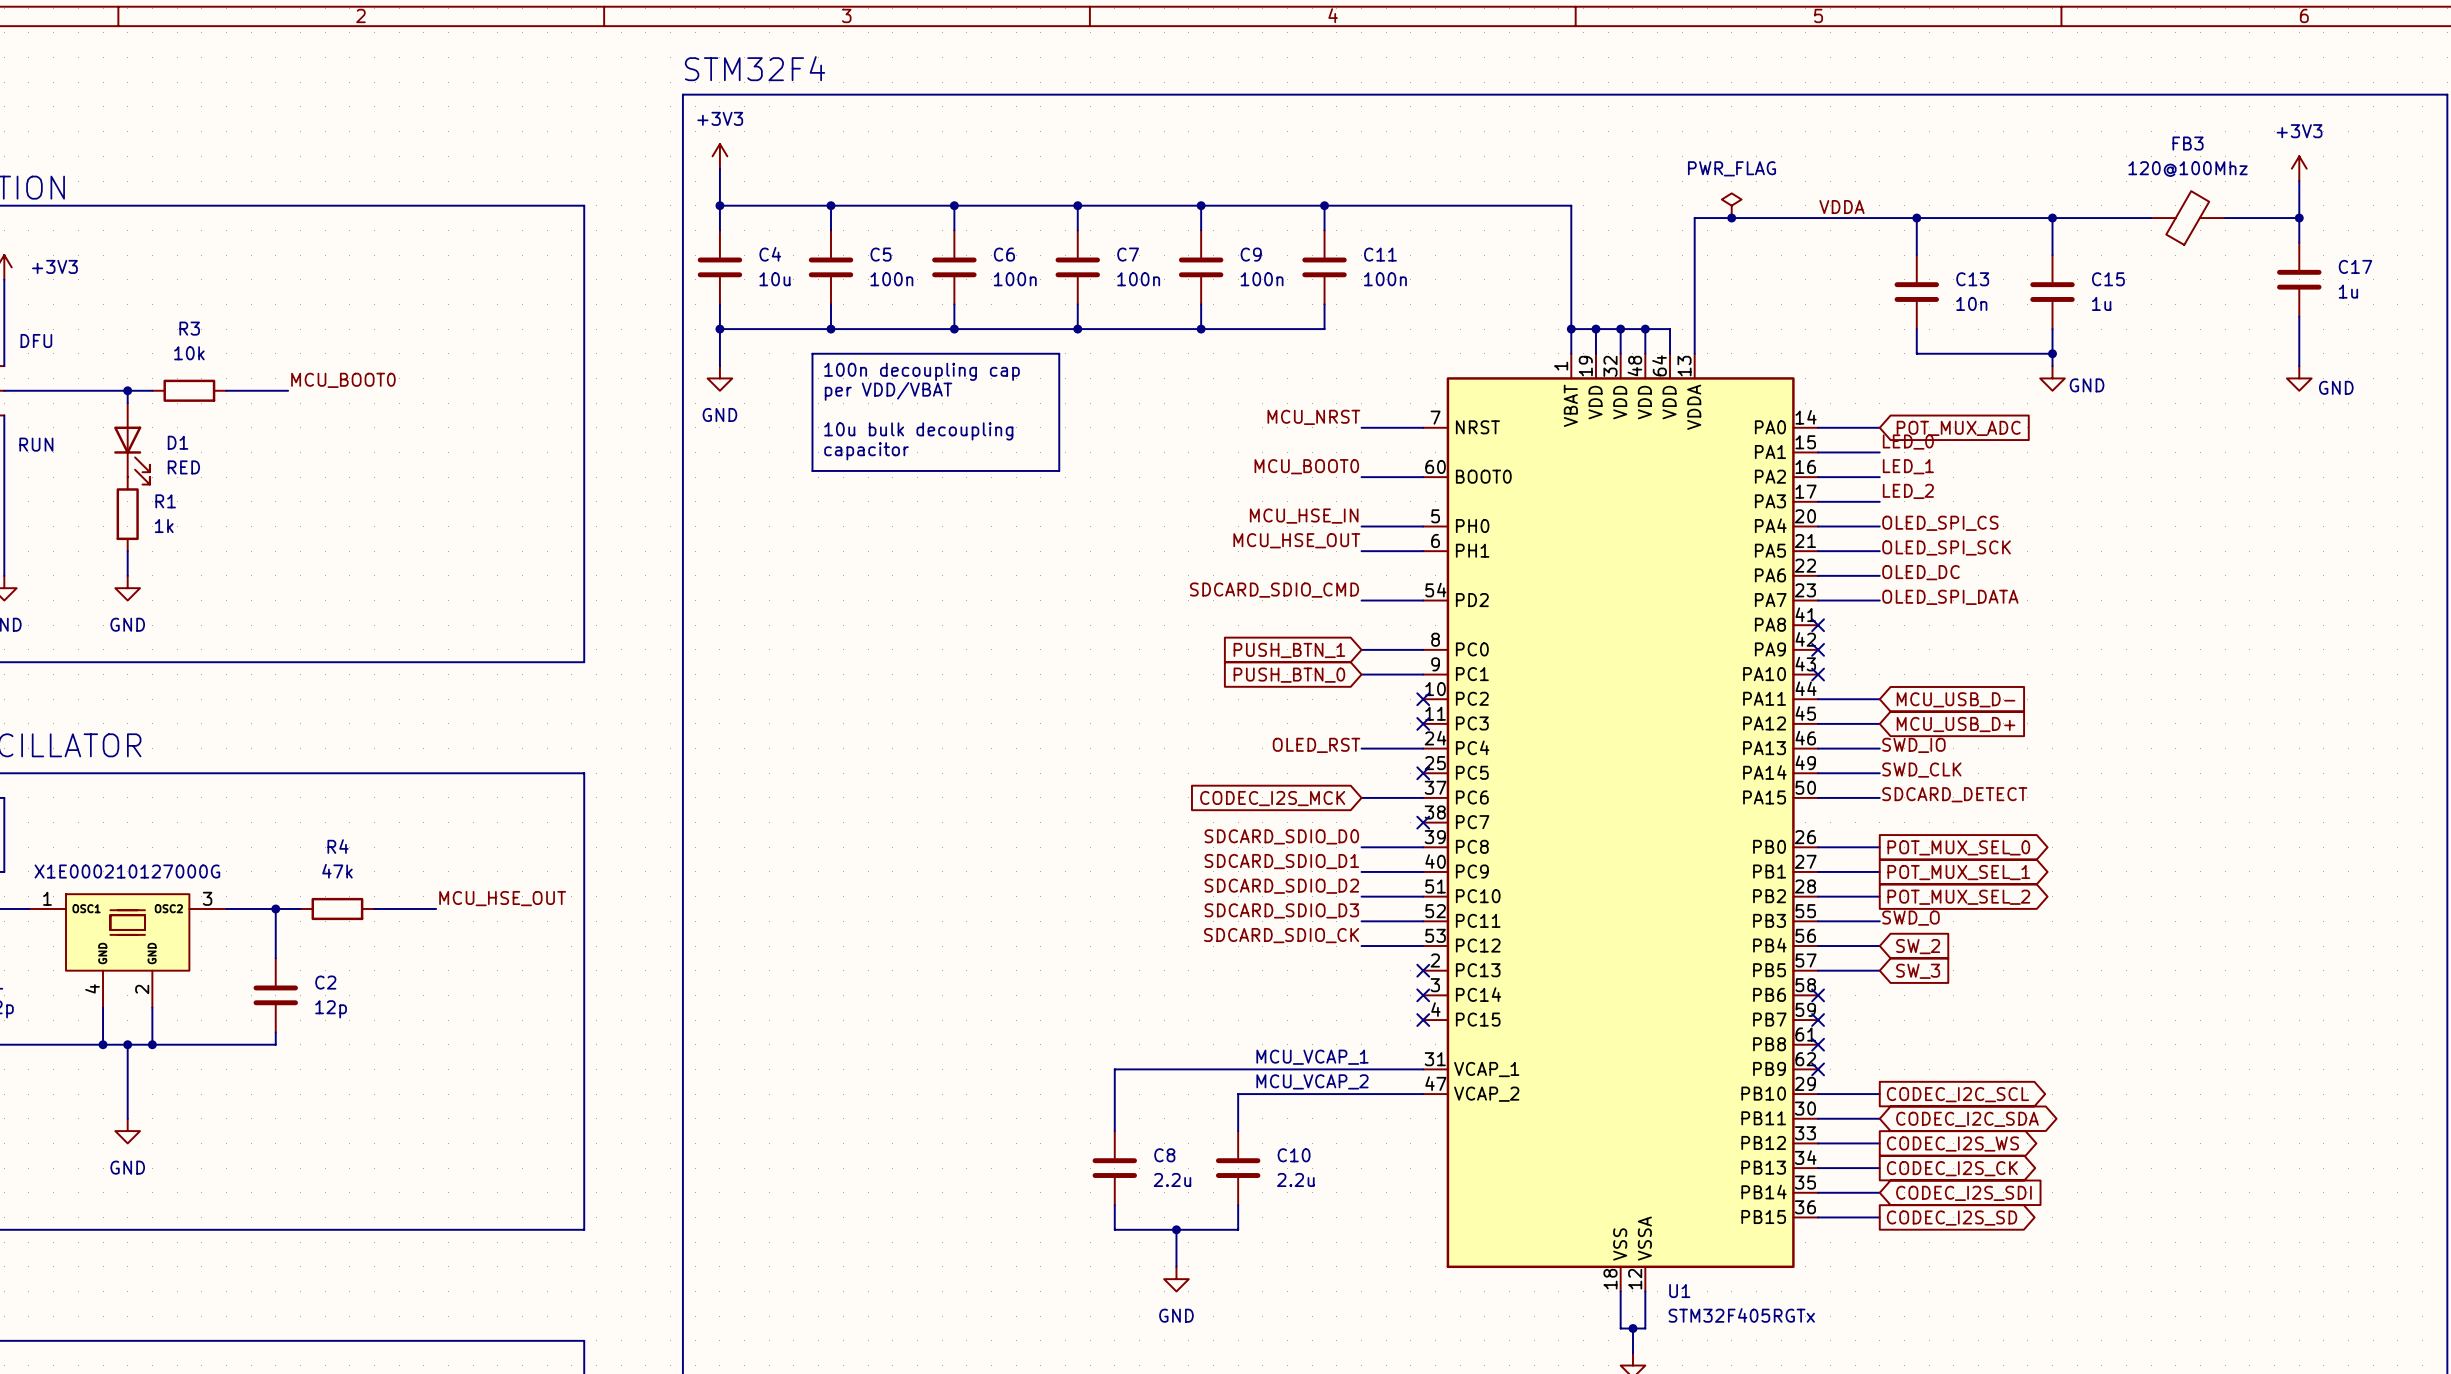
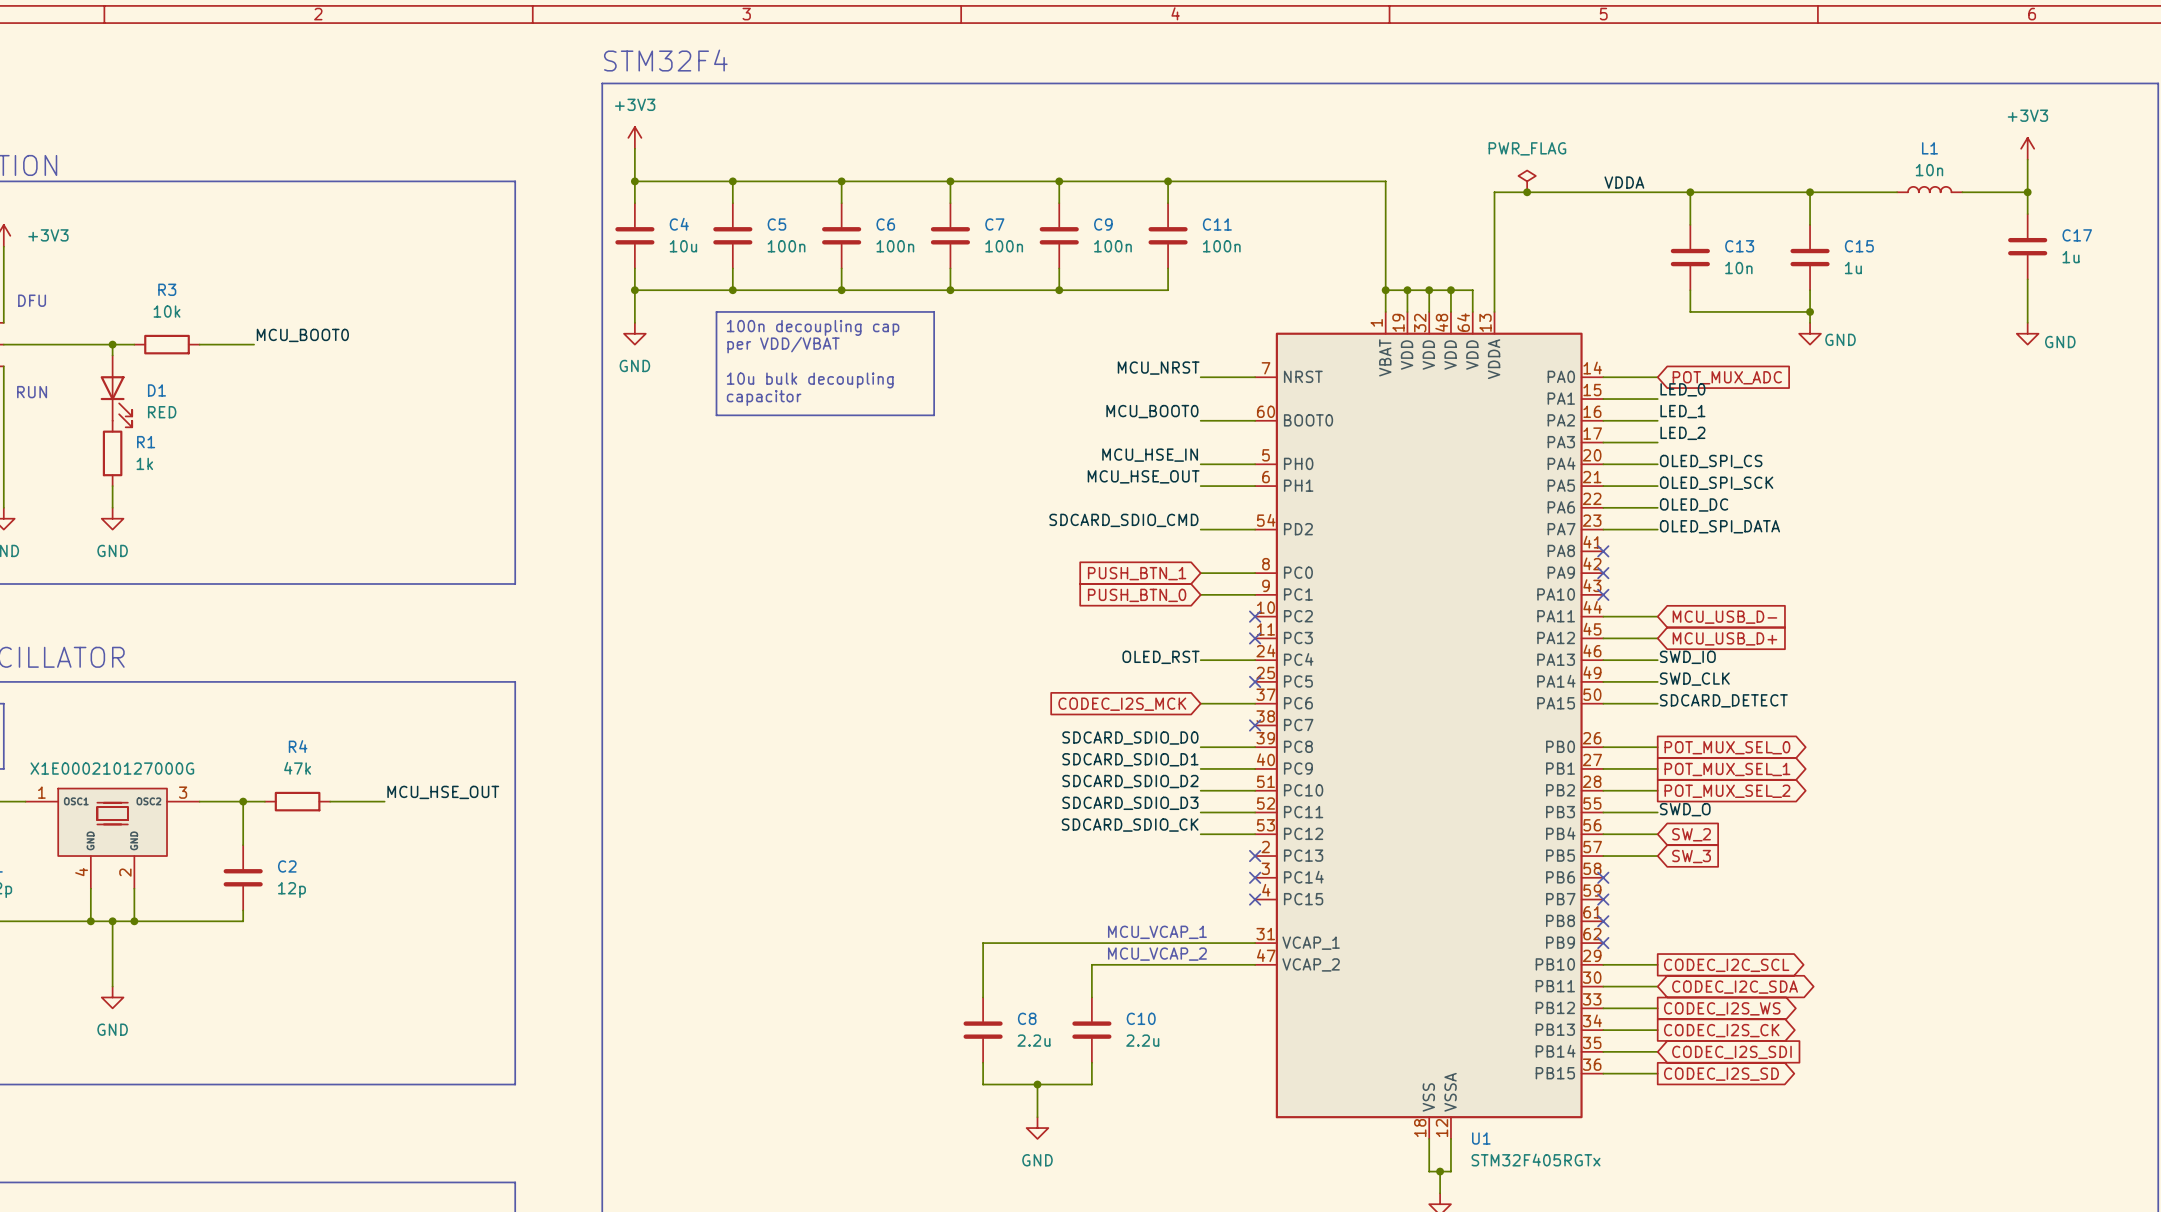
L1: none -> 10n (1929, 189)
FB3: 120@100Mhz (2188, 218) -> none

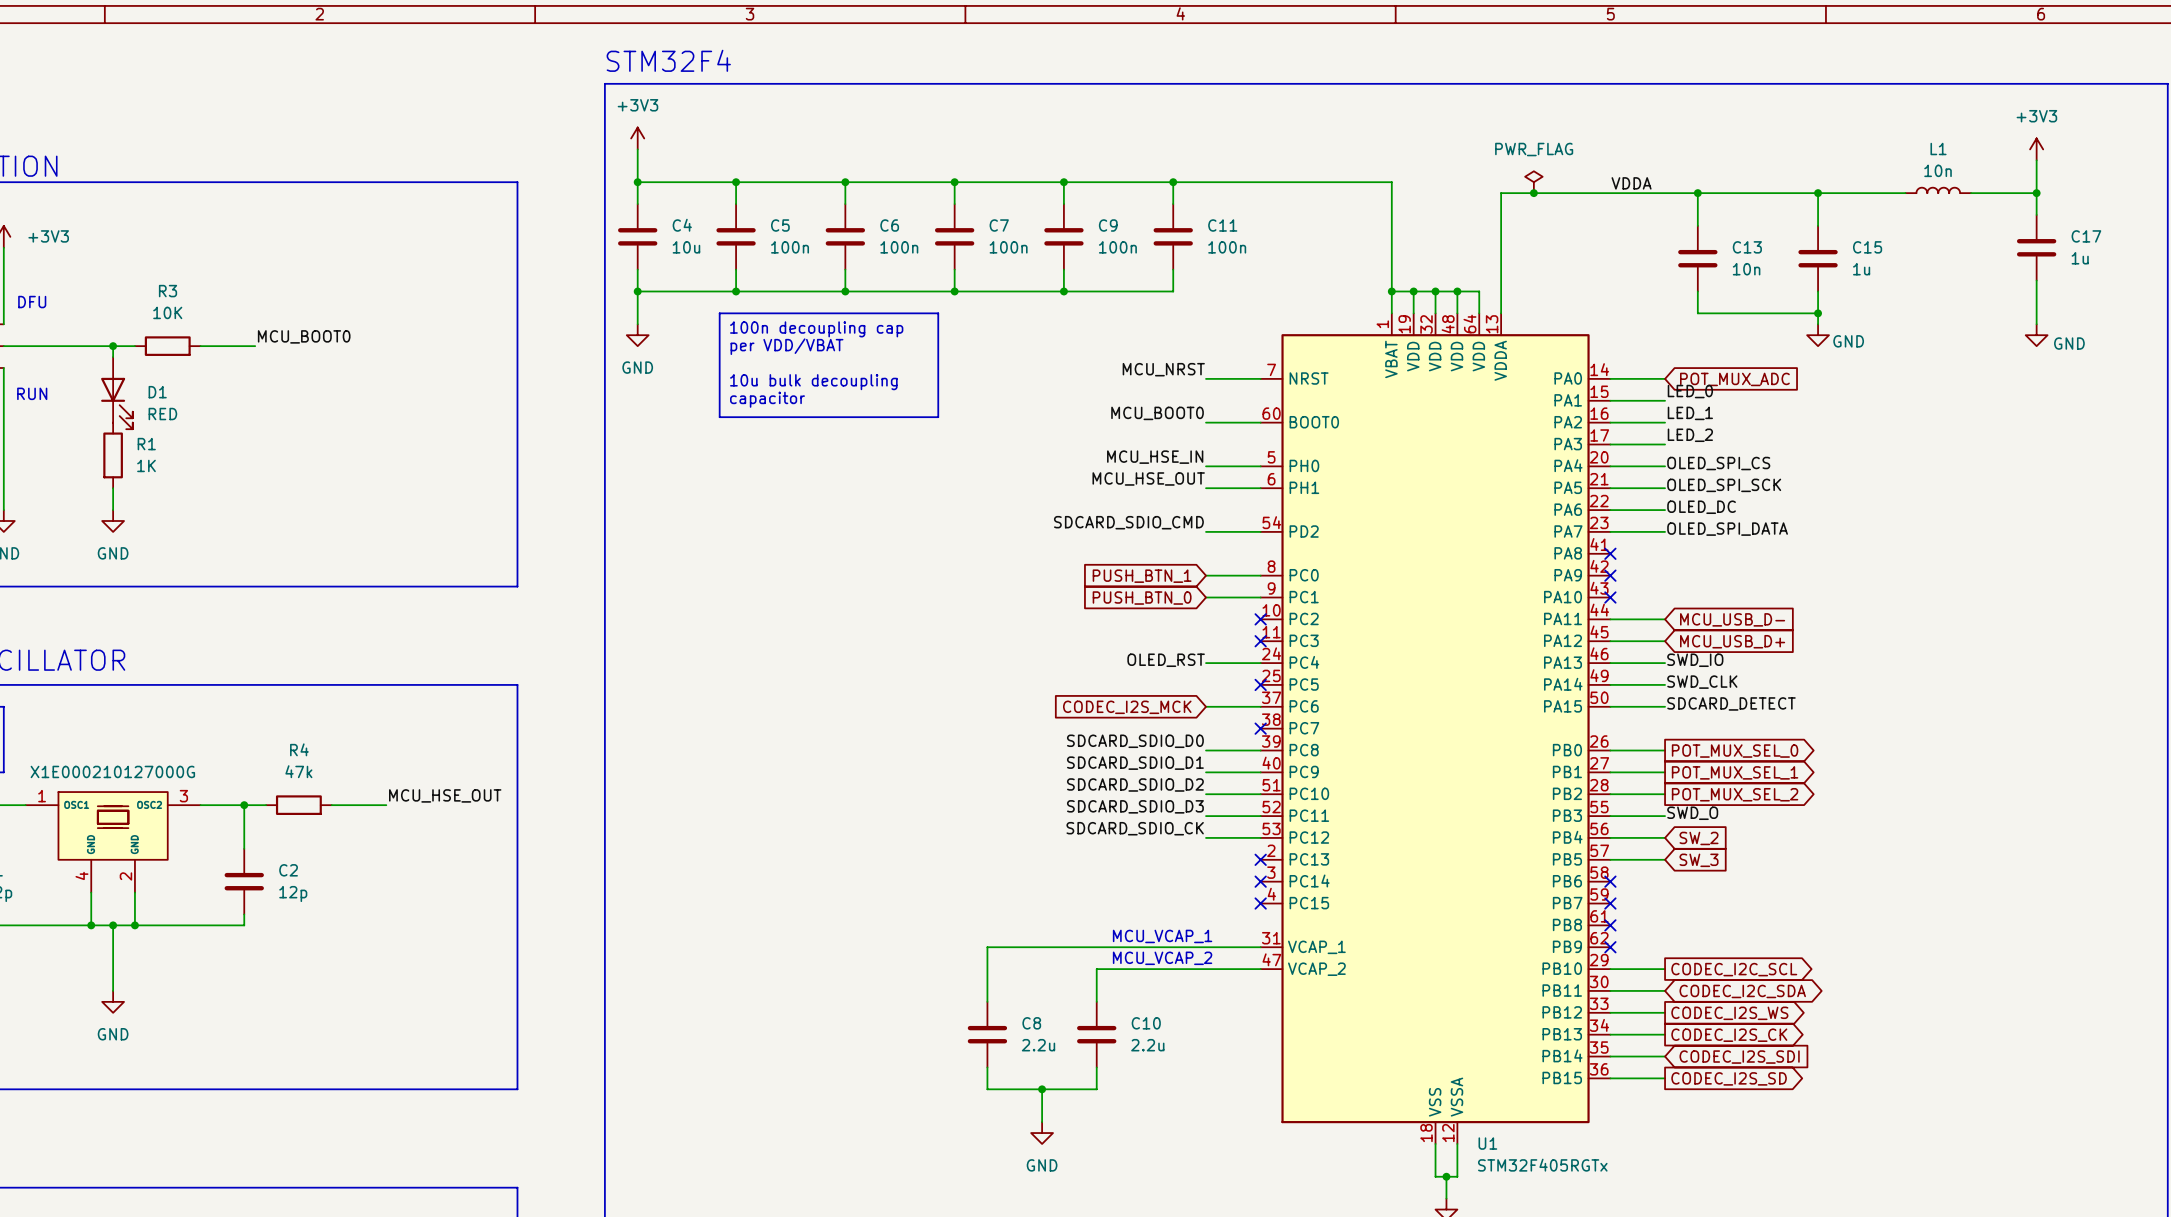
R3 value: 10k (167, 311) -> 10K (167, 312)
R1 value: 1k (144, 463) -> 1K (146, 465)

